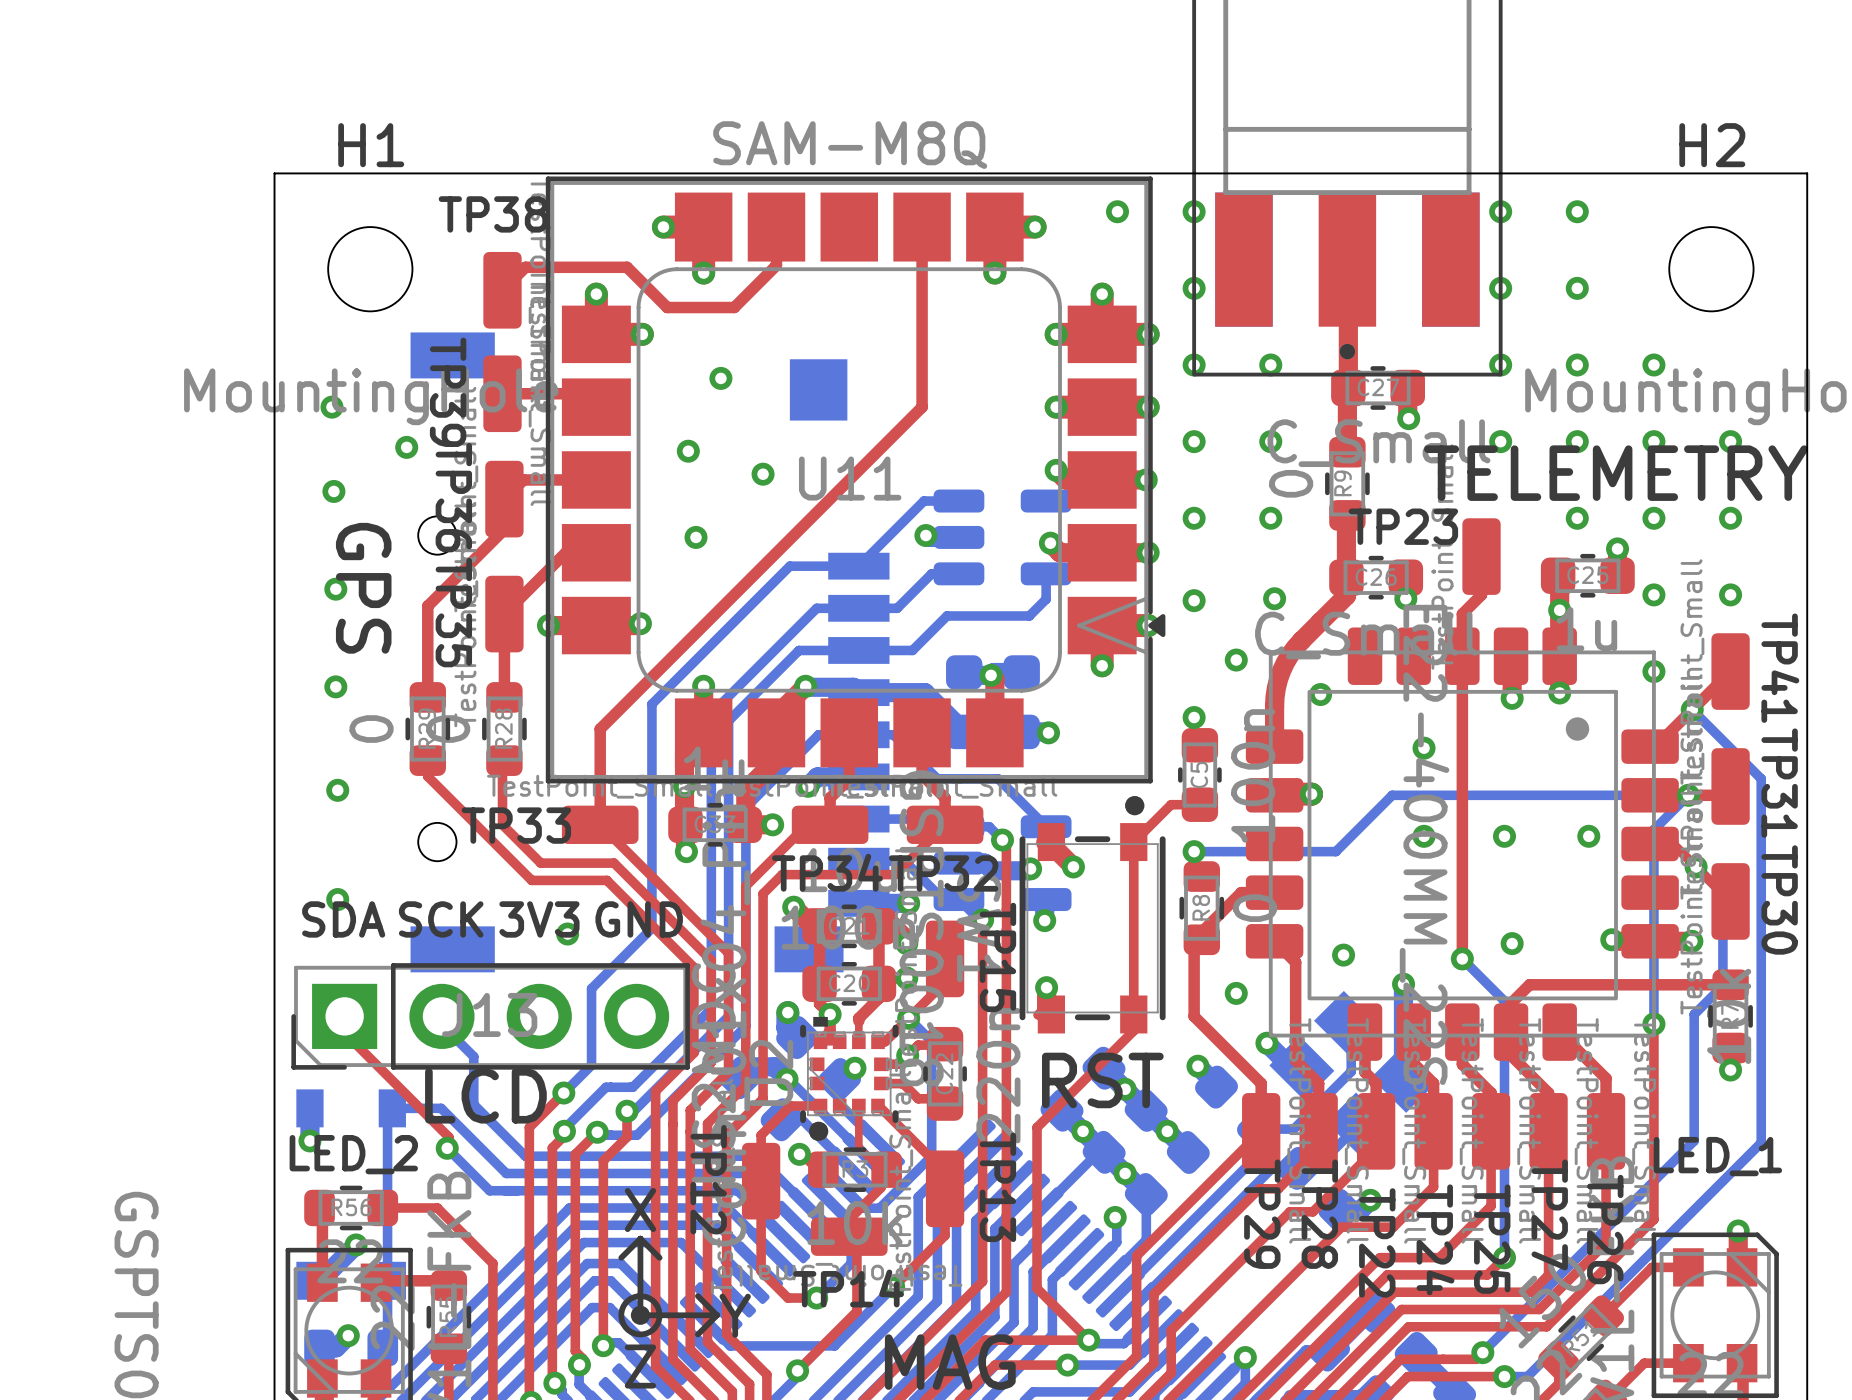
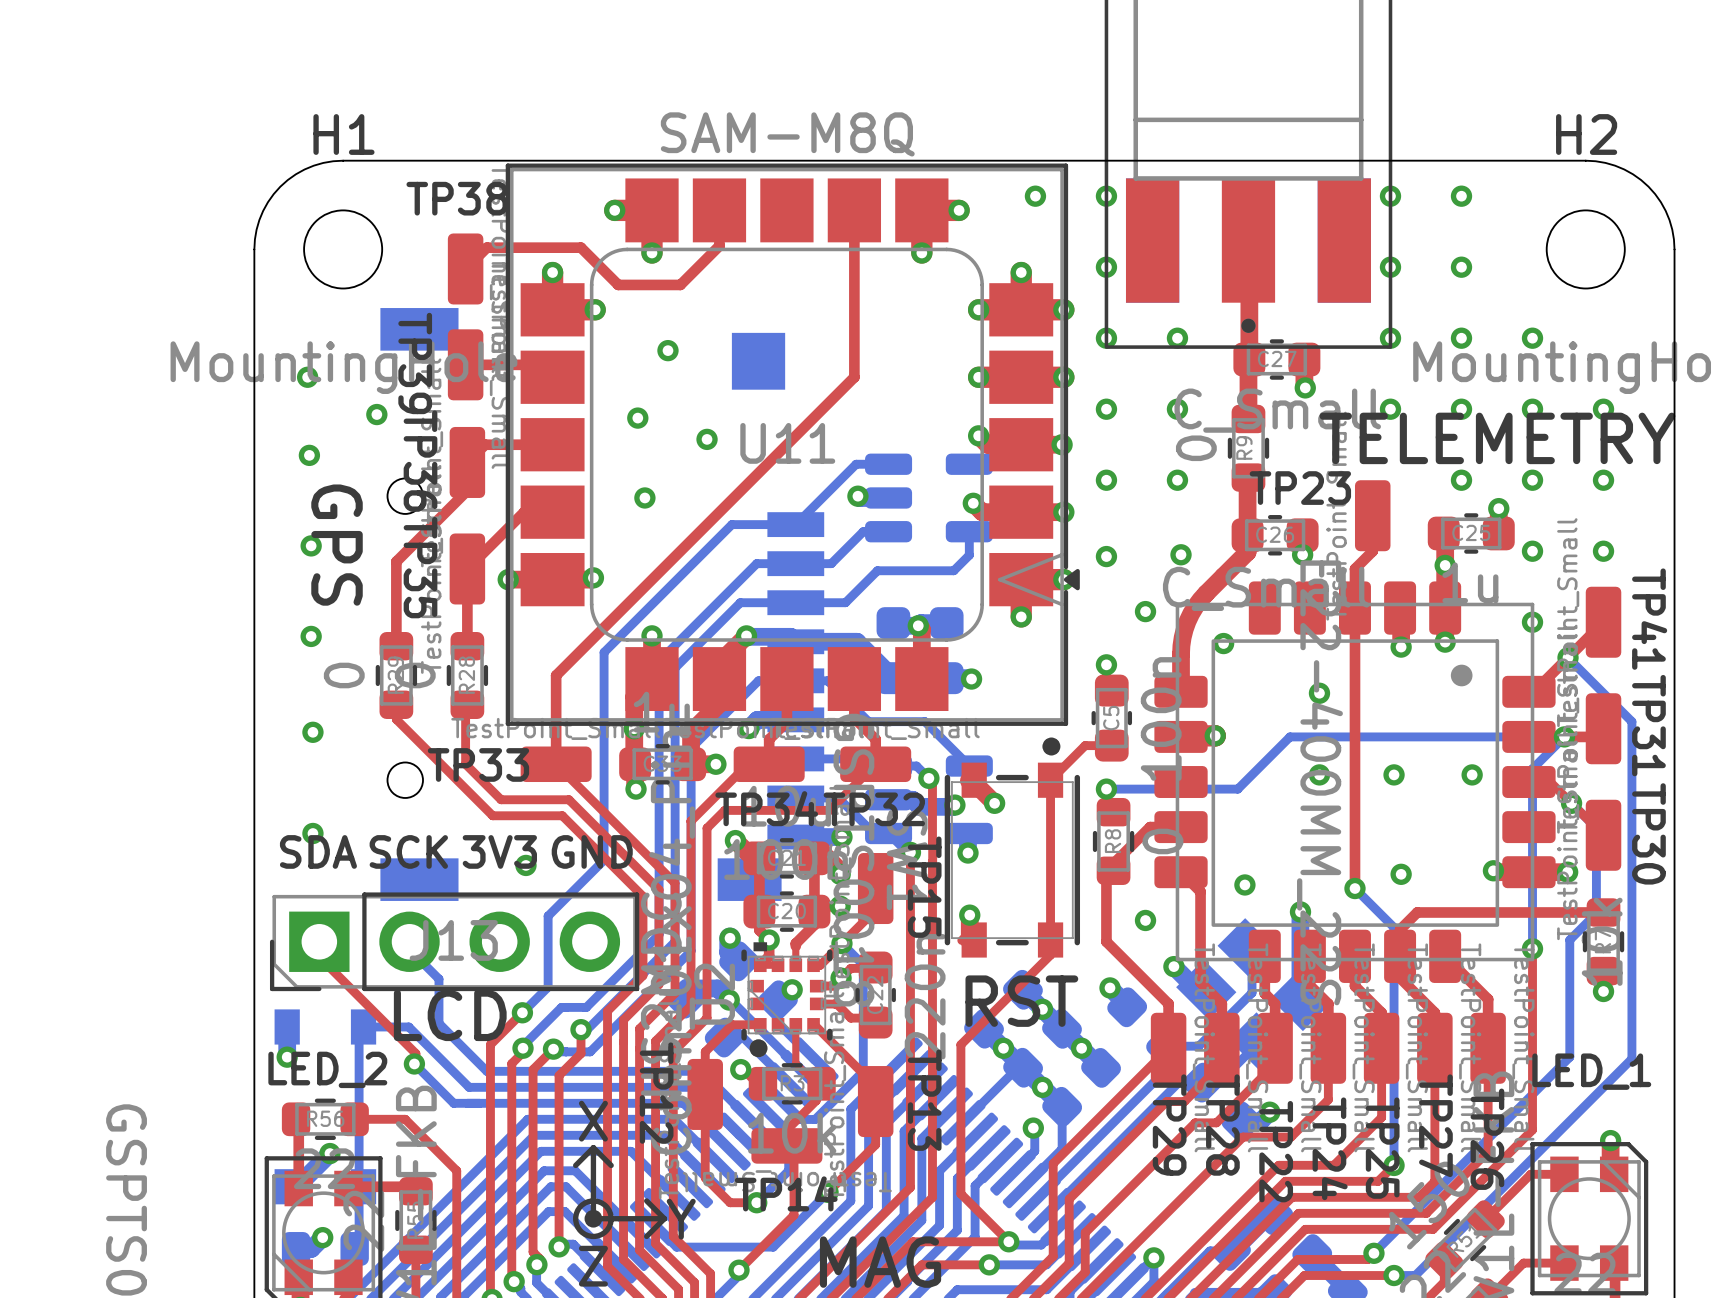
board edge: (370, 173) (274, 173) (274, 269) -> (343, 160) (323, 162) (304, 169) (280, 186) (263, 210) (256, 229) (254, 249)
board edge: (1711, 173) (1807, 173) (1807, 269) -> (1585, 160) (1605, 162) (1624, 169) (1648, 186) (1665, 210) (1672, 229) (1674, 249)

